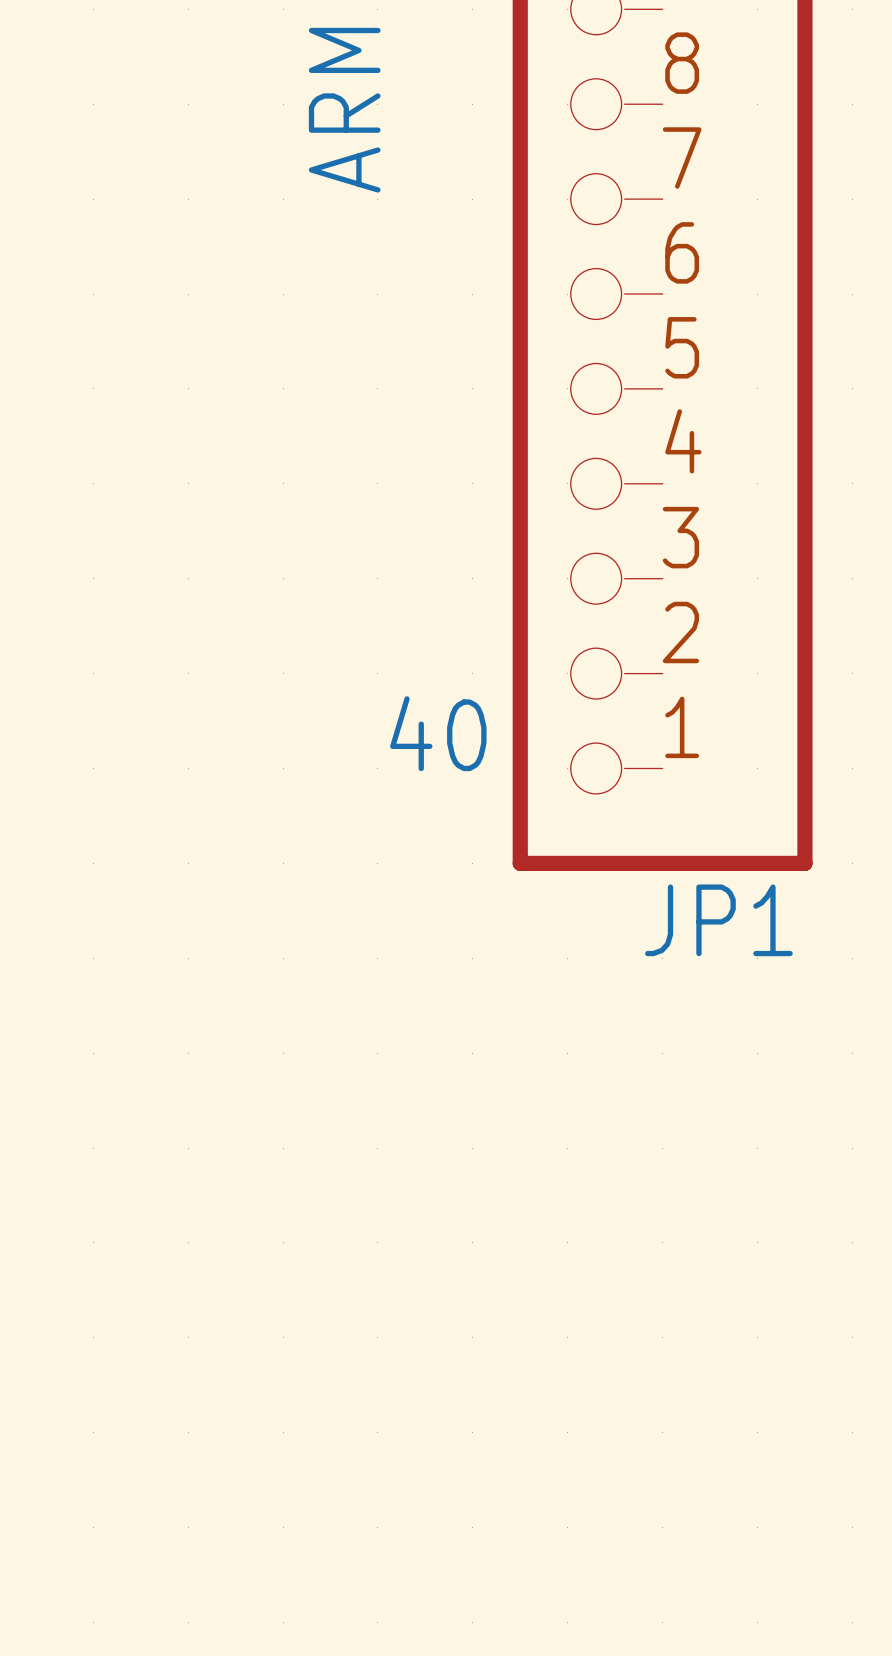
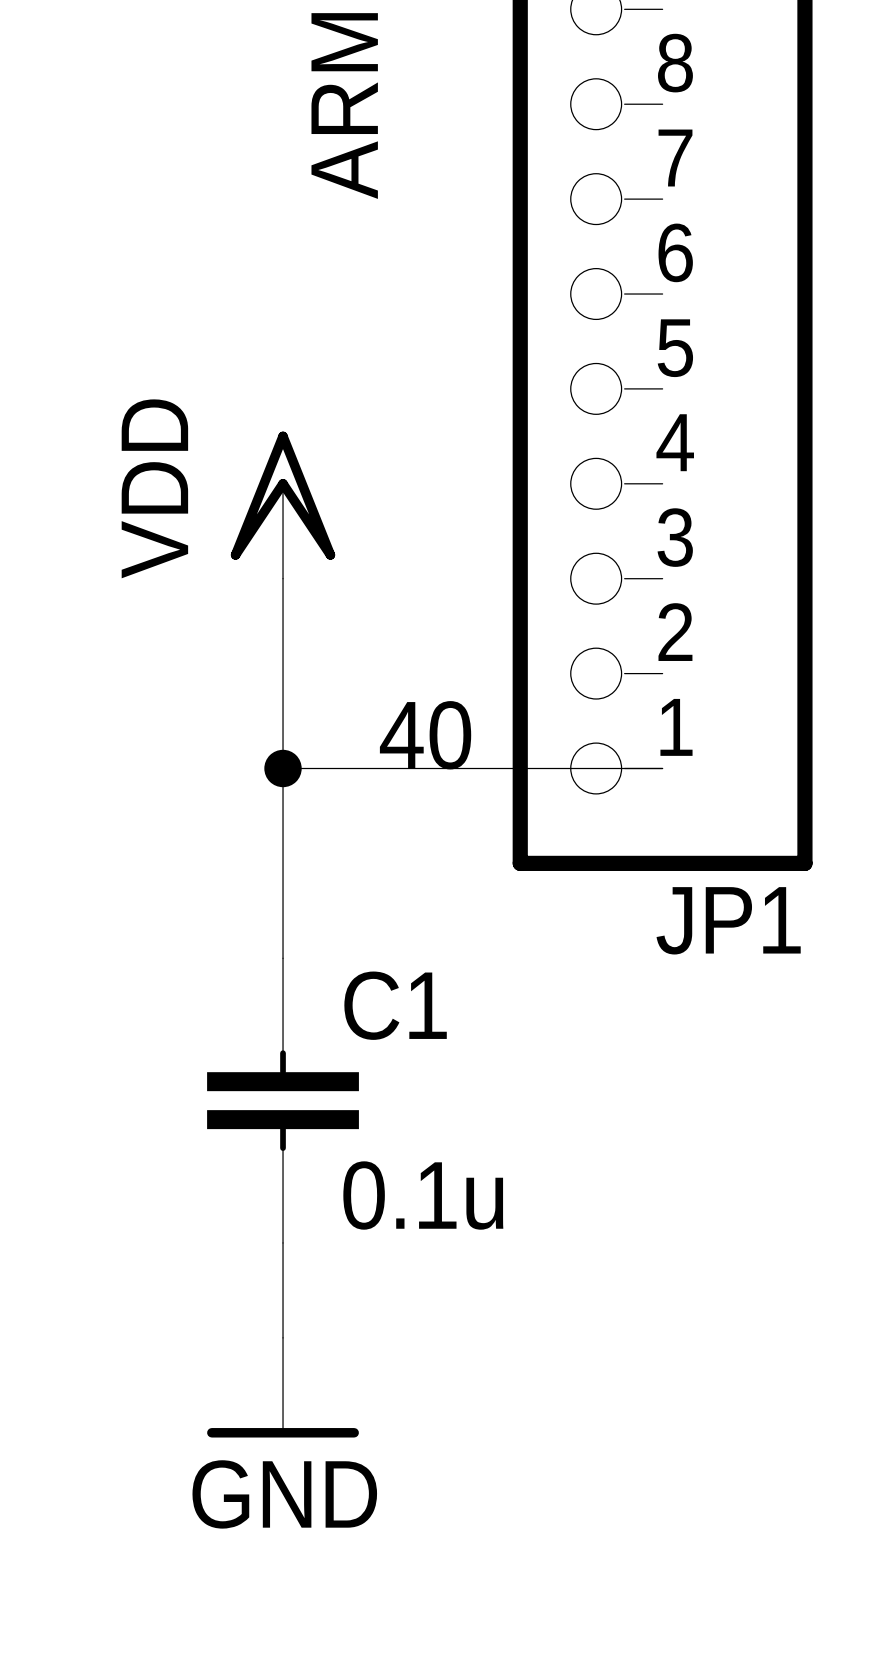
power symbol: none -> VDD (283, 505)
wire: none -> (283, 578) (283, 958)
wire: none -> (283, 768) (662, 768)
junction: none -> (283, 768)
C1: none -> 0.1u (283, 1100)
wire: none -> (283, 1242) (283, 1337)
power symbol: none -> GND (283, 1387)

